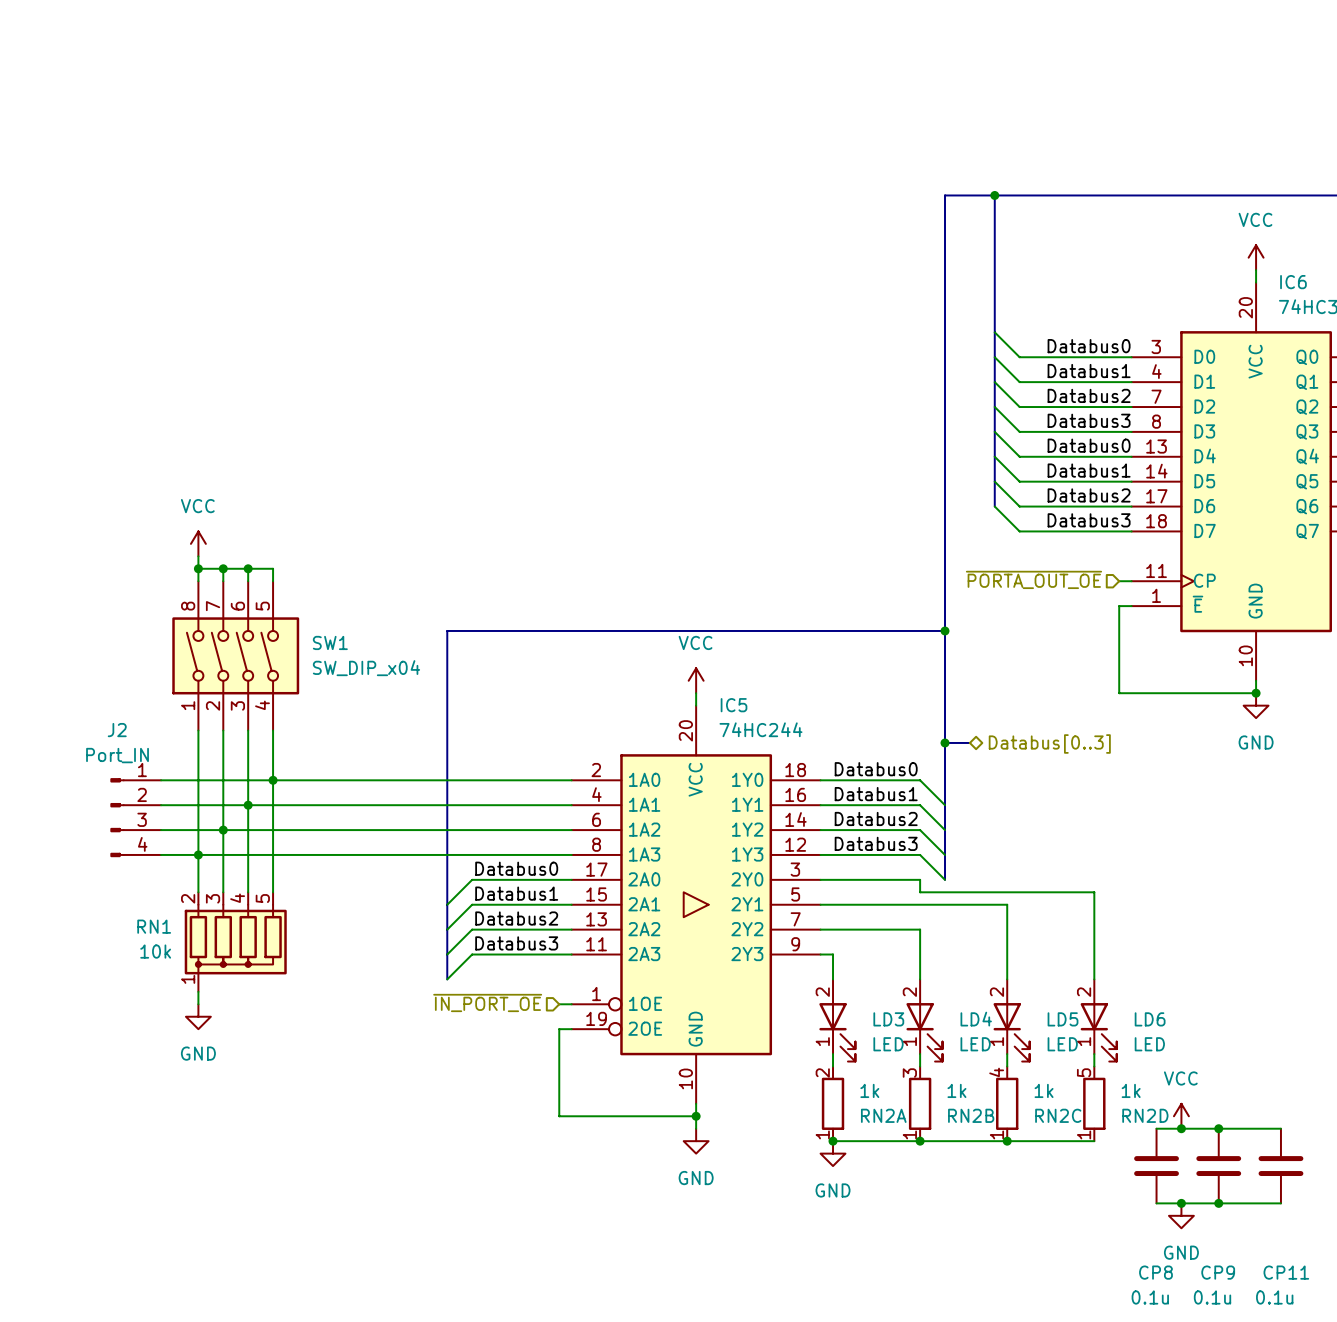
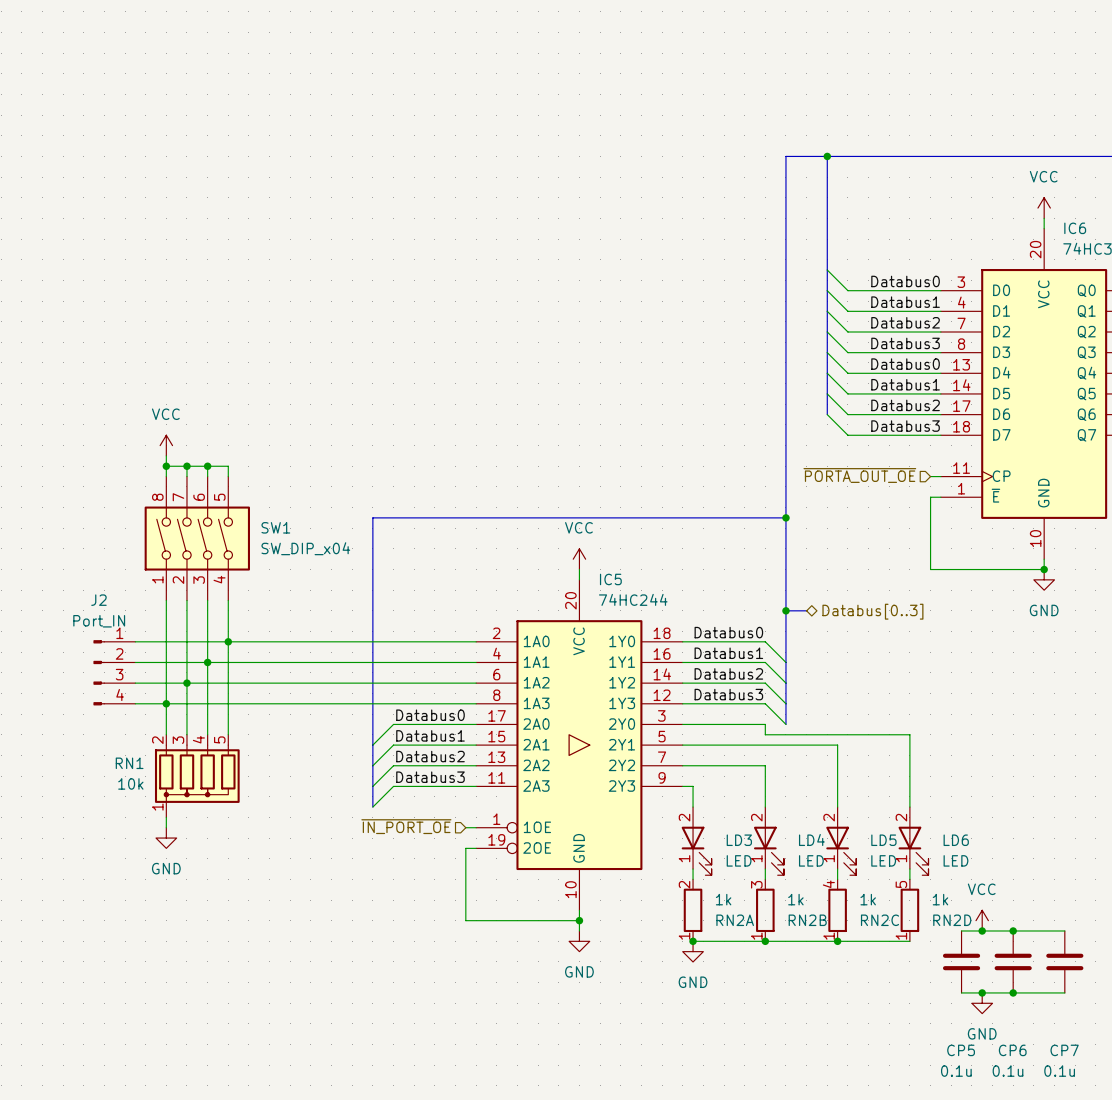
CP8 name: CP8 (1155, 1272) -> CP5 (961, 1050)
CP9 name: CP9 (1218, 1272) -> CP6 (1012, 1050)
CP11 name: CP11 (1286, 1272) -> CP7 (1064, 1050)

